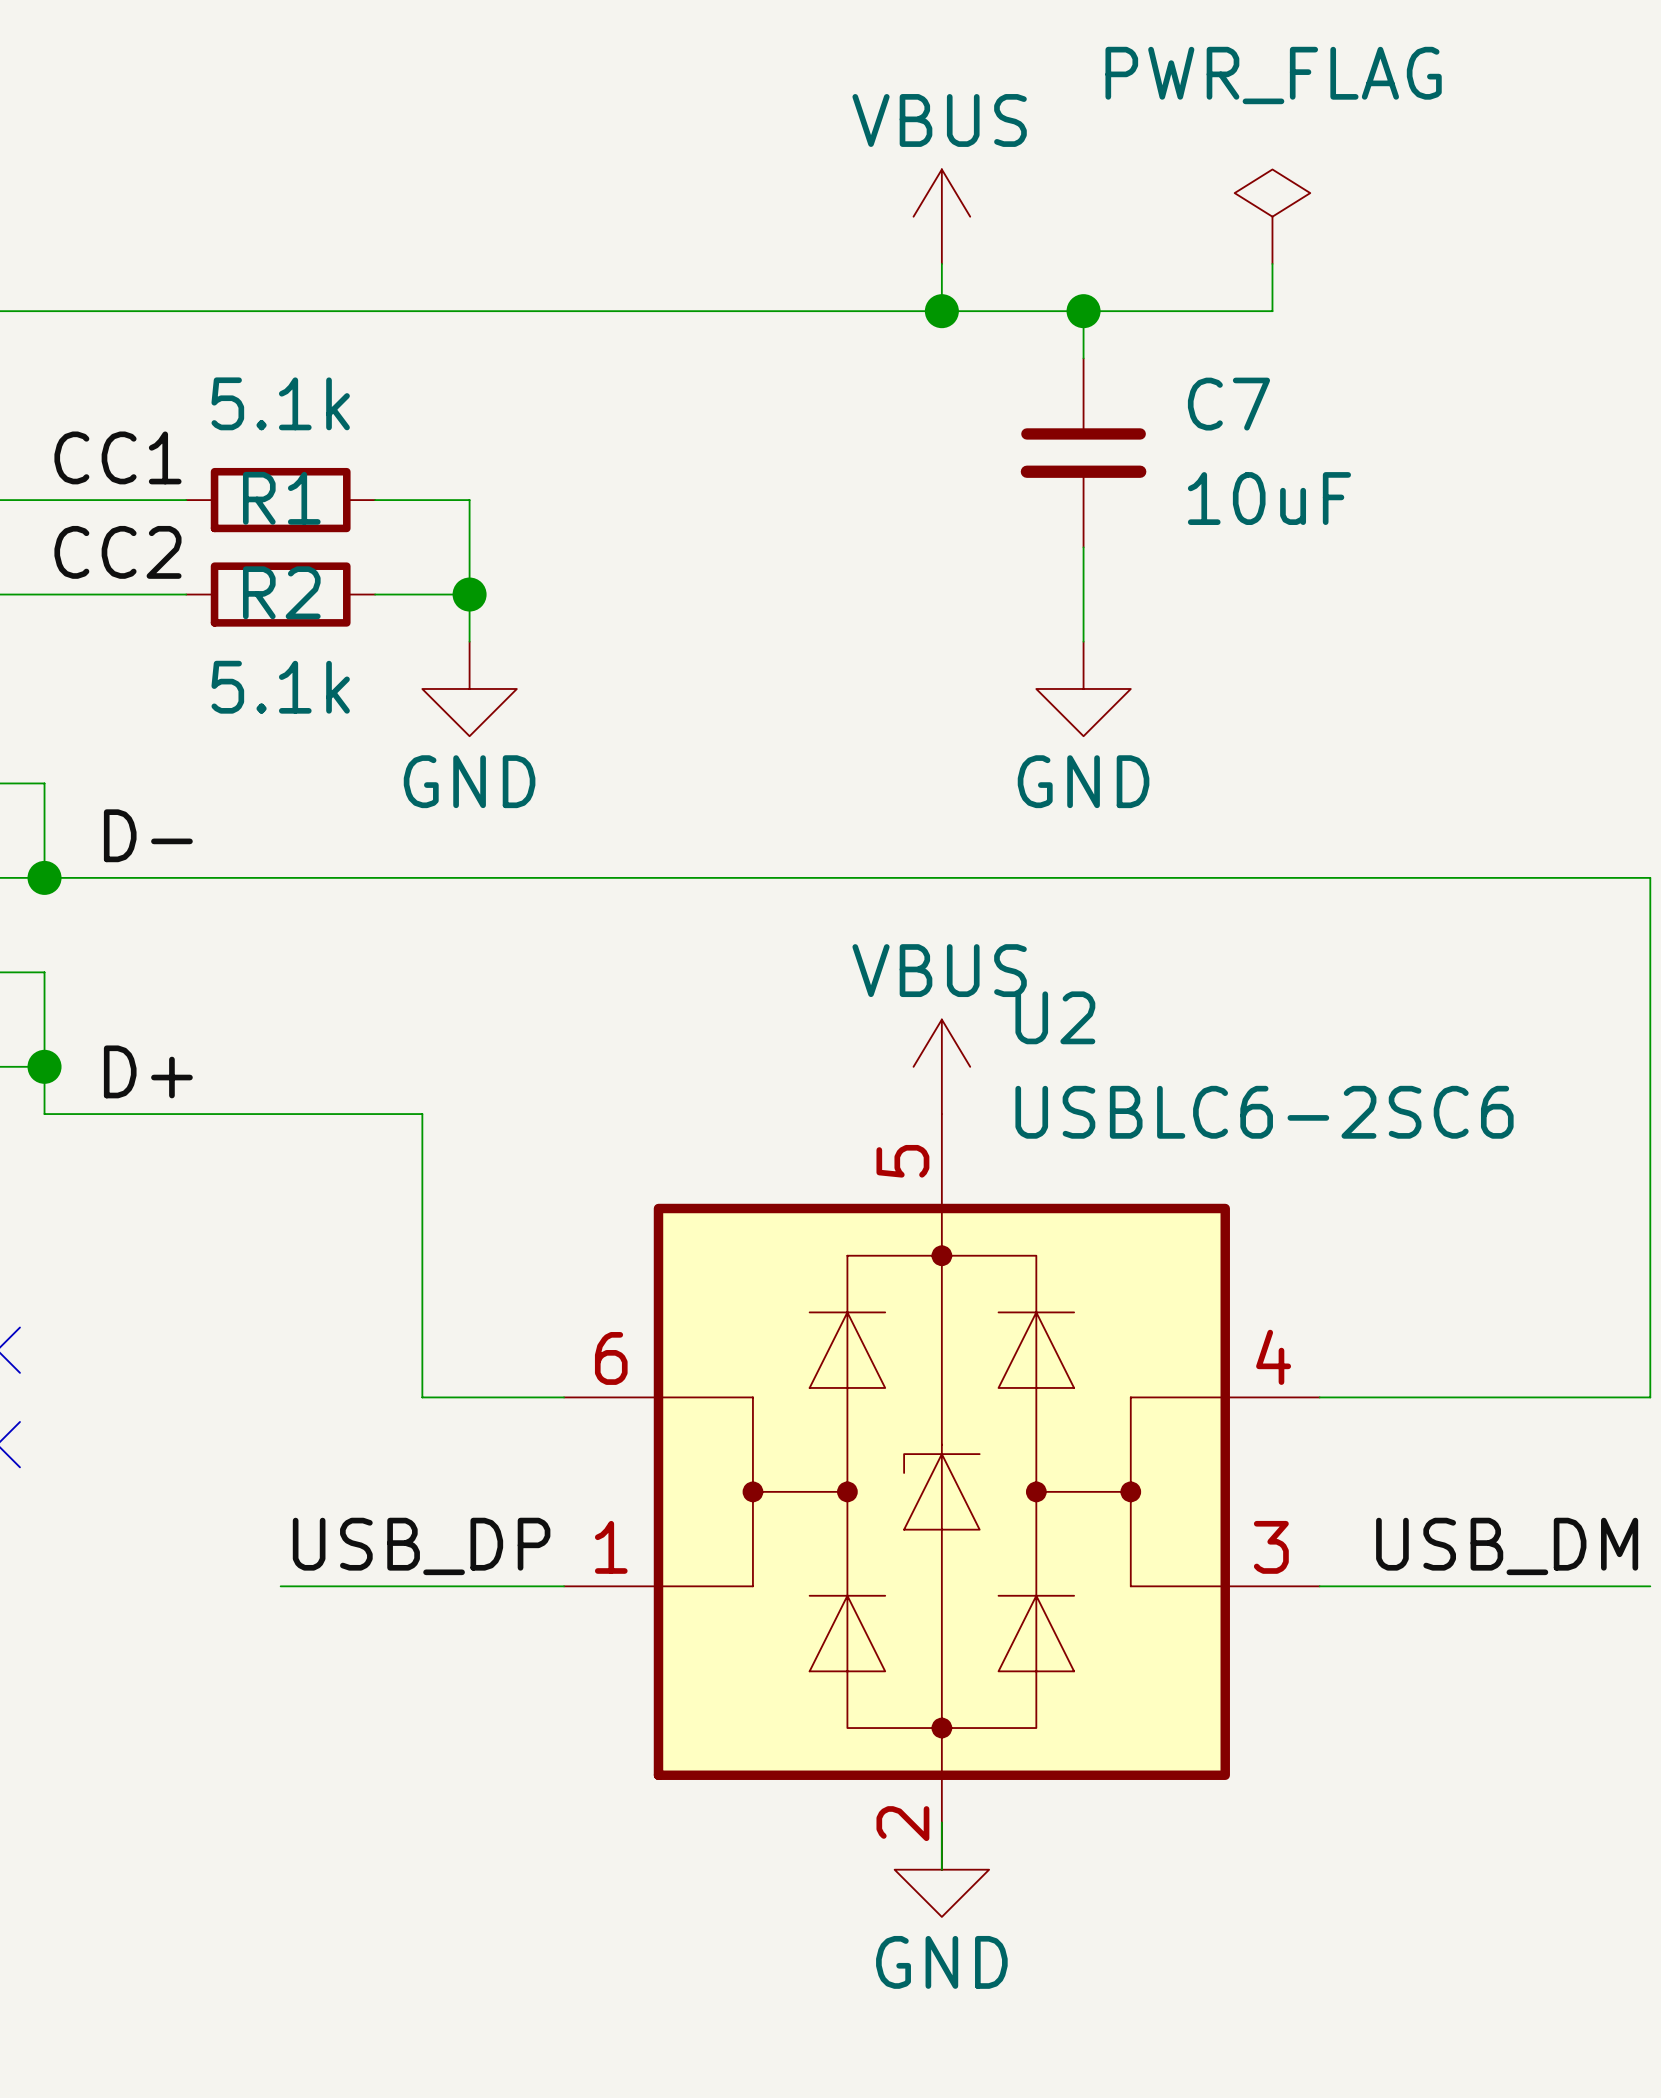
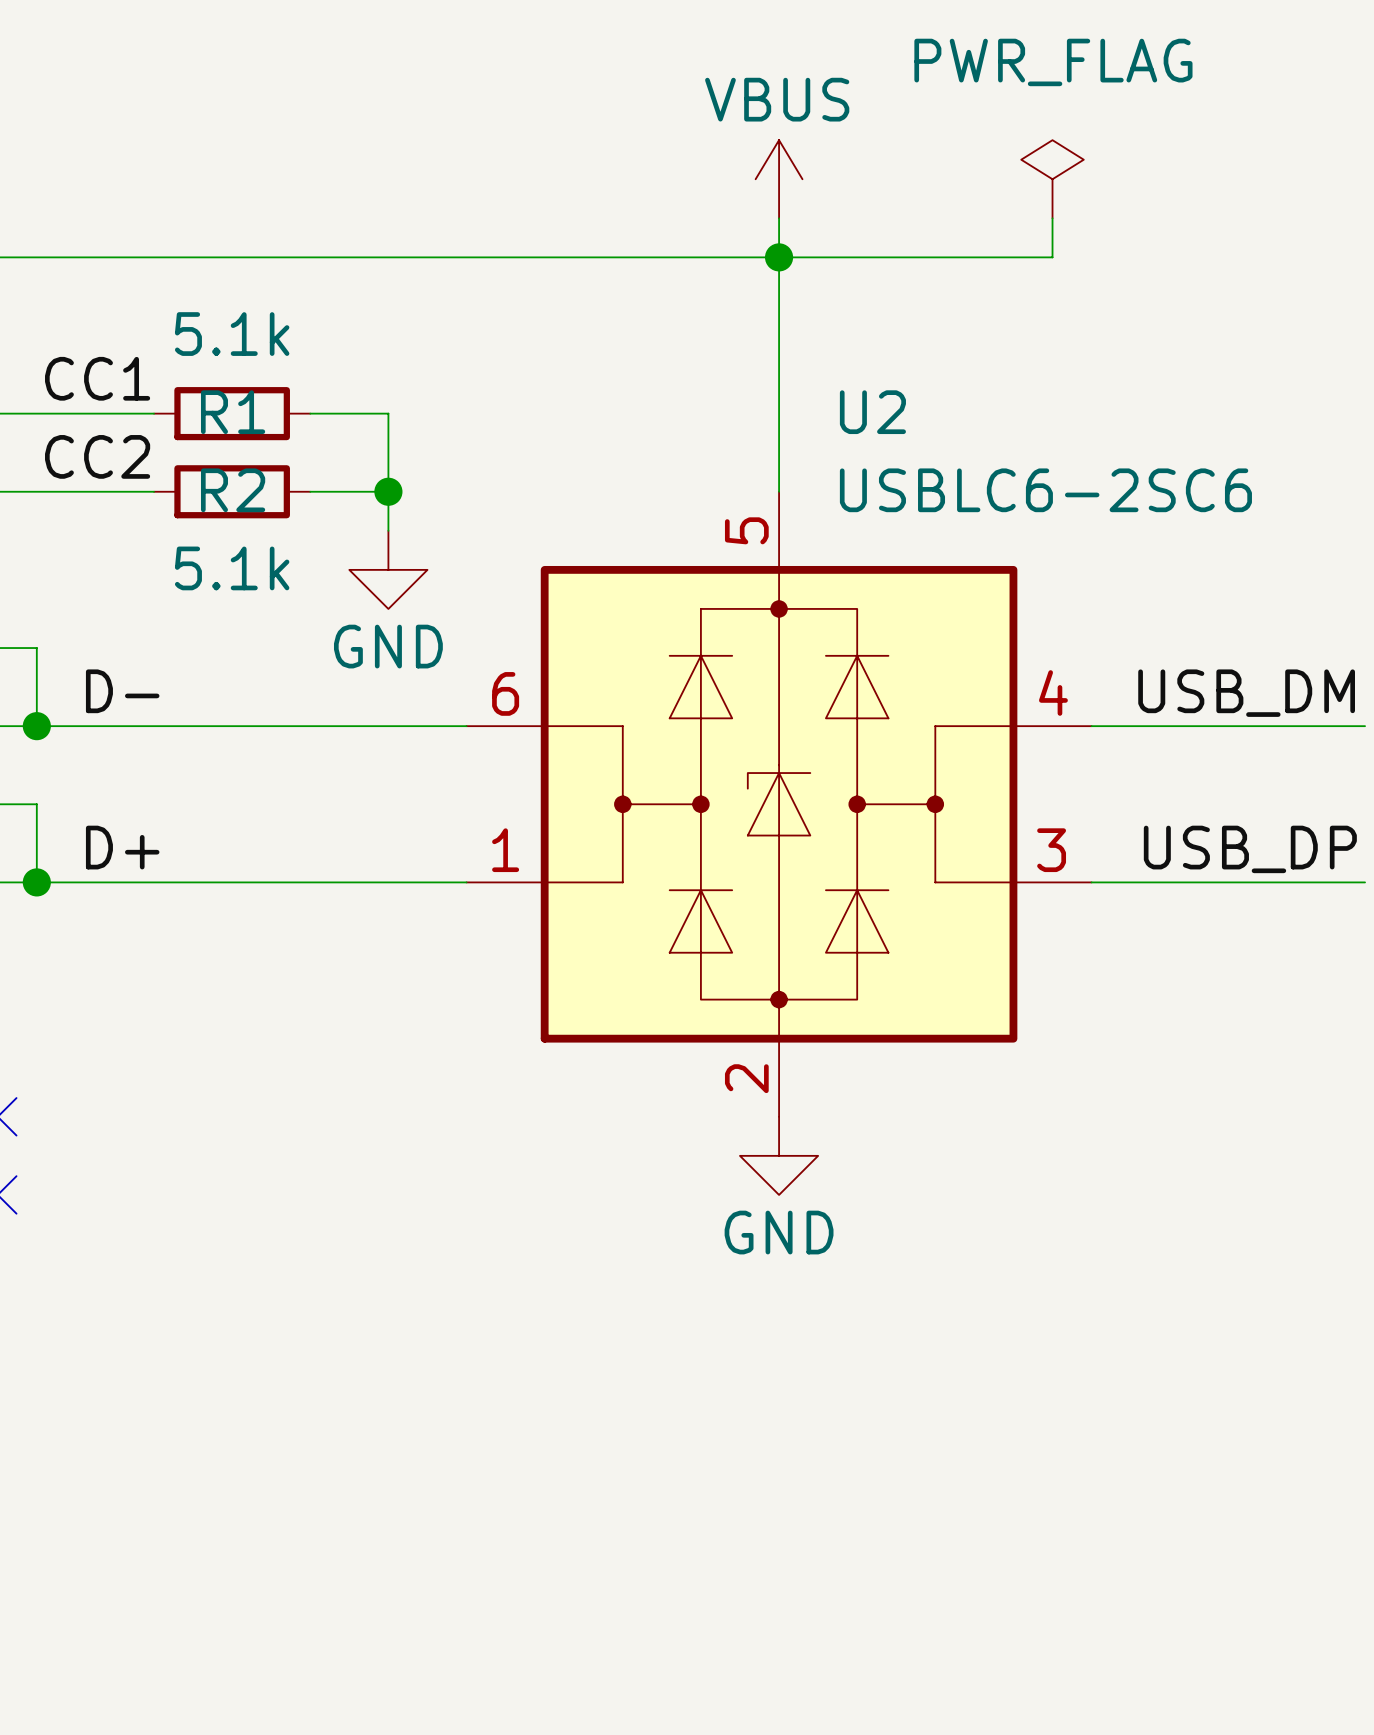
wire: none -> (779, 257) (779, 491)
wire: (1083, 311) (1083, 358) -> none
junction: (1083, 311) -> none
C7: 10uF (1083, 452) -> none
wire: (1083, 547) (1083, 641) -> none
power symbol: GND (1083, 688) -> none
wire: (1650, 877) (1650, 1397) (1319, 1397) -> none
label: none -> USB_DP (1250, 849)
wire: (44, 1066) (44, 1114) (422, 1114) (422, 1397) (564, 1397) -> (36, 882) (466, 882)
power symbol: VBUS (941, 1066) -> none
label position: D+ (148, 1071) -> D+ (122, 847)
power symbol: none -> GND (779, 1155)
U2 position: (941, 1491) -> (779, 804)
label: USB_DP (421, 1546) -> none
label position: USB_DM (1507, 1546) -> USB_DM (1246, 693)
wire: (280, 1586) (564, 1586) -> none
wire: (1319, 1586) (1650, 1586) -> (1091, 882) (1365, 882)
wire: (941, 1822) (941, 1869) -> none
power symbol: GND (941, 1869) -> none

